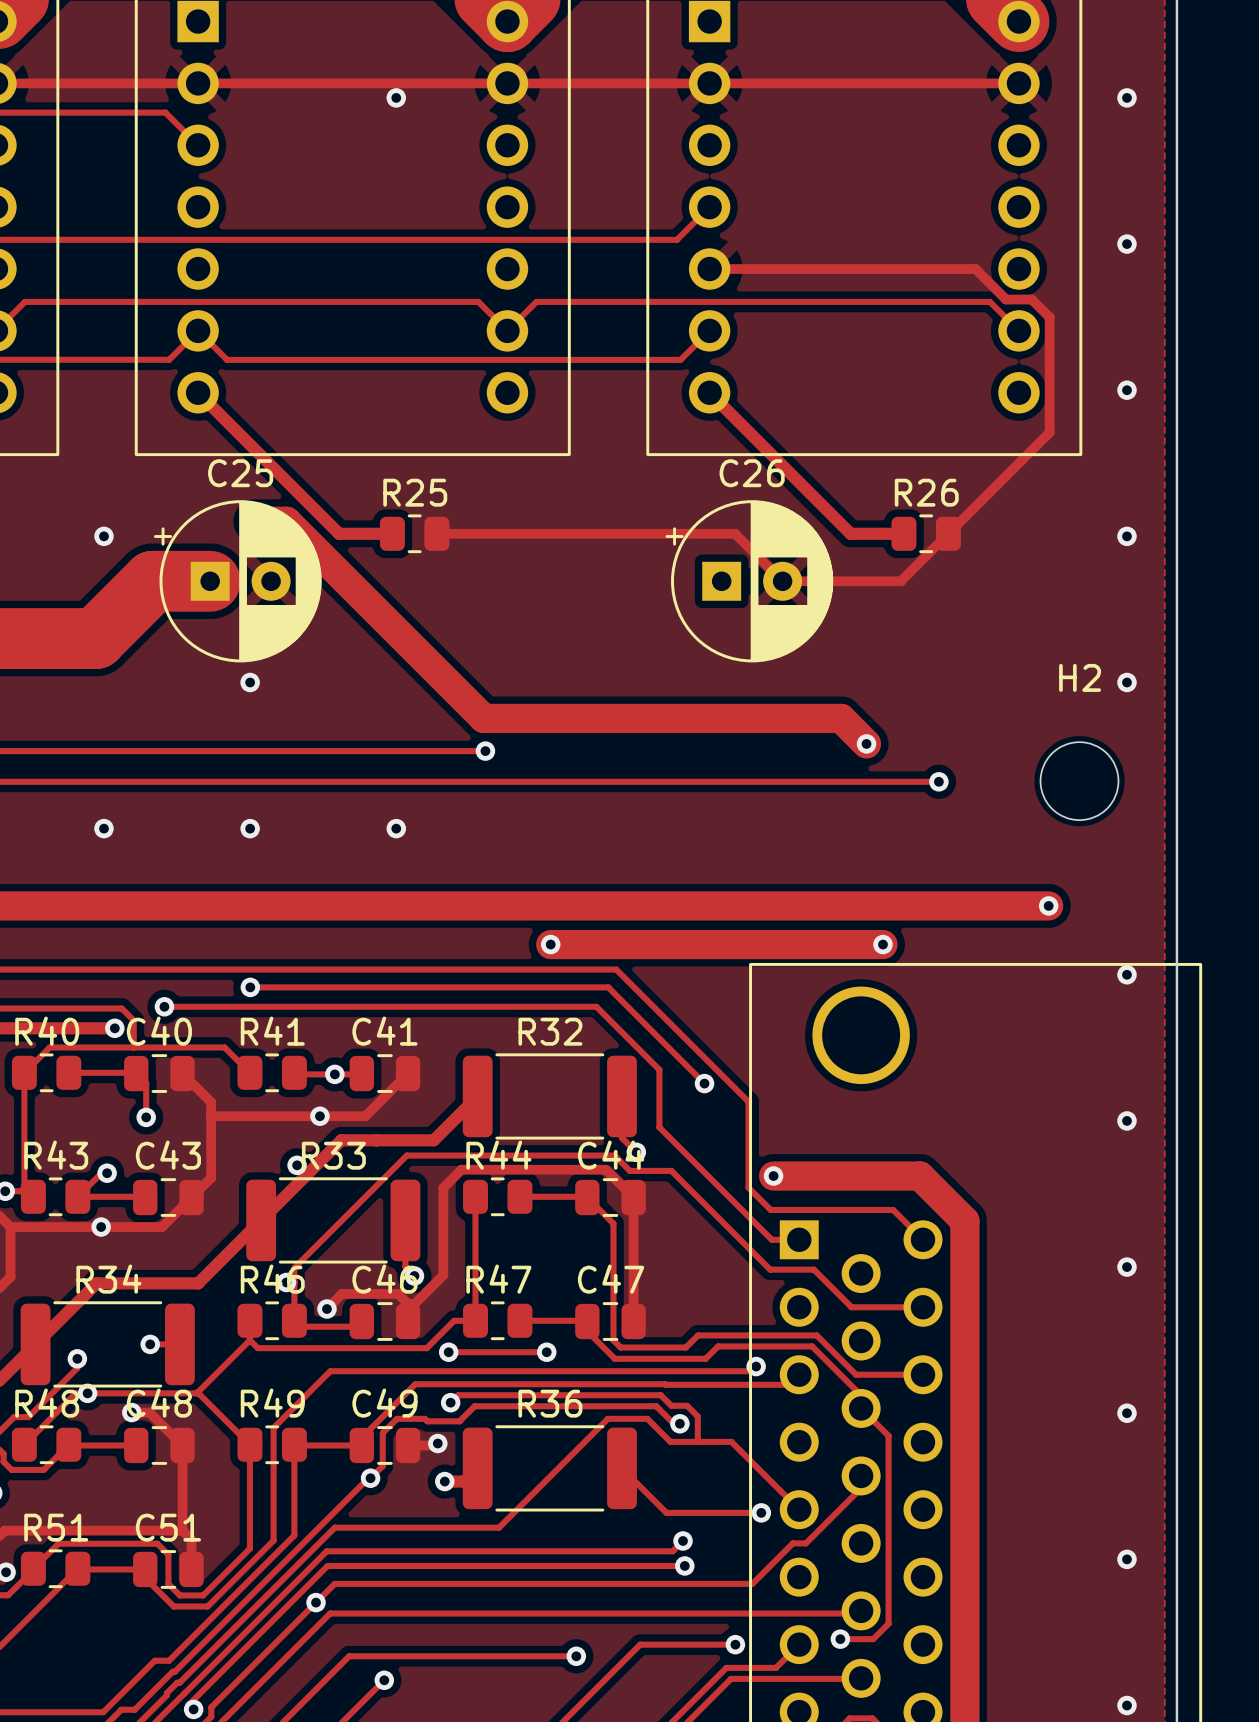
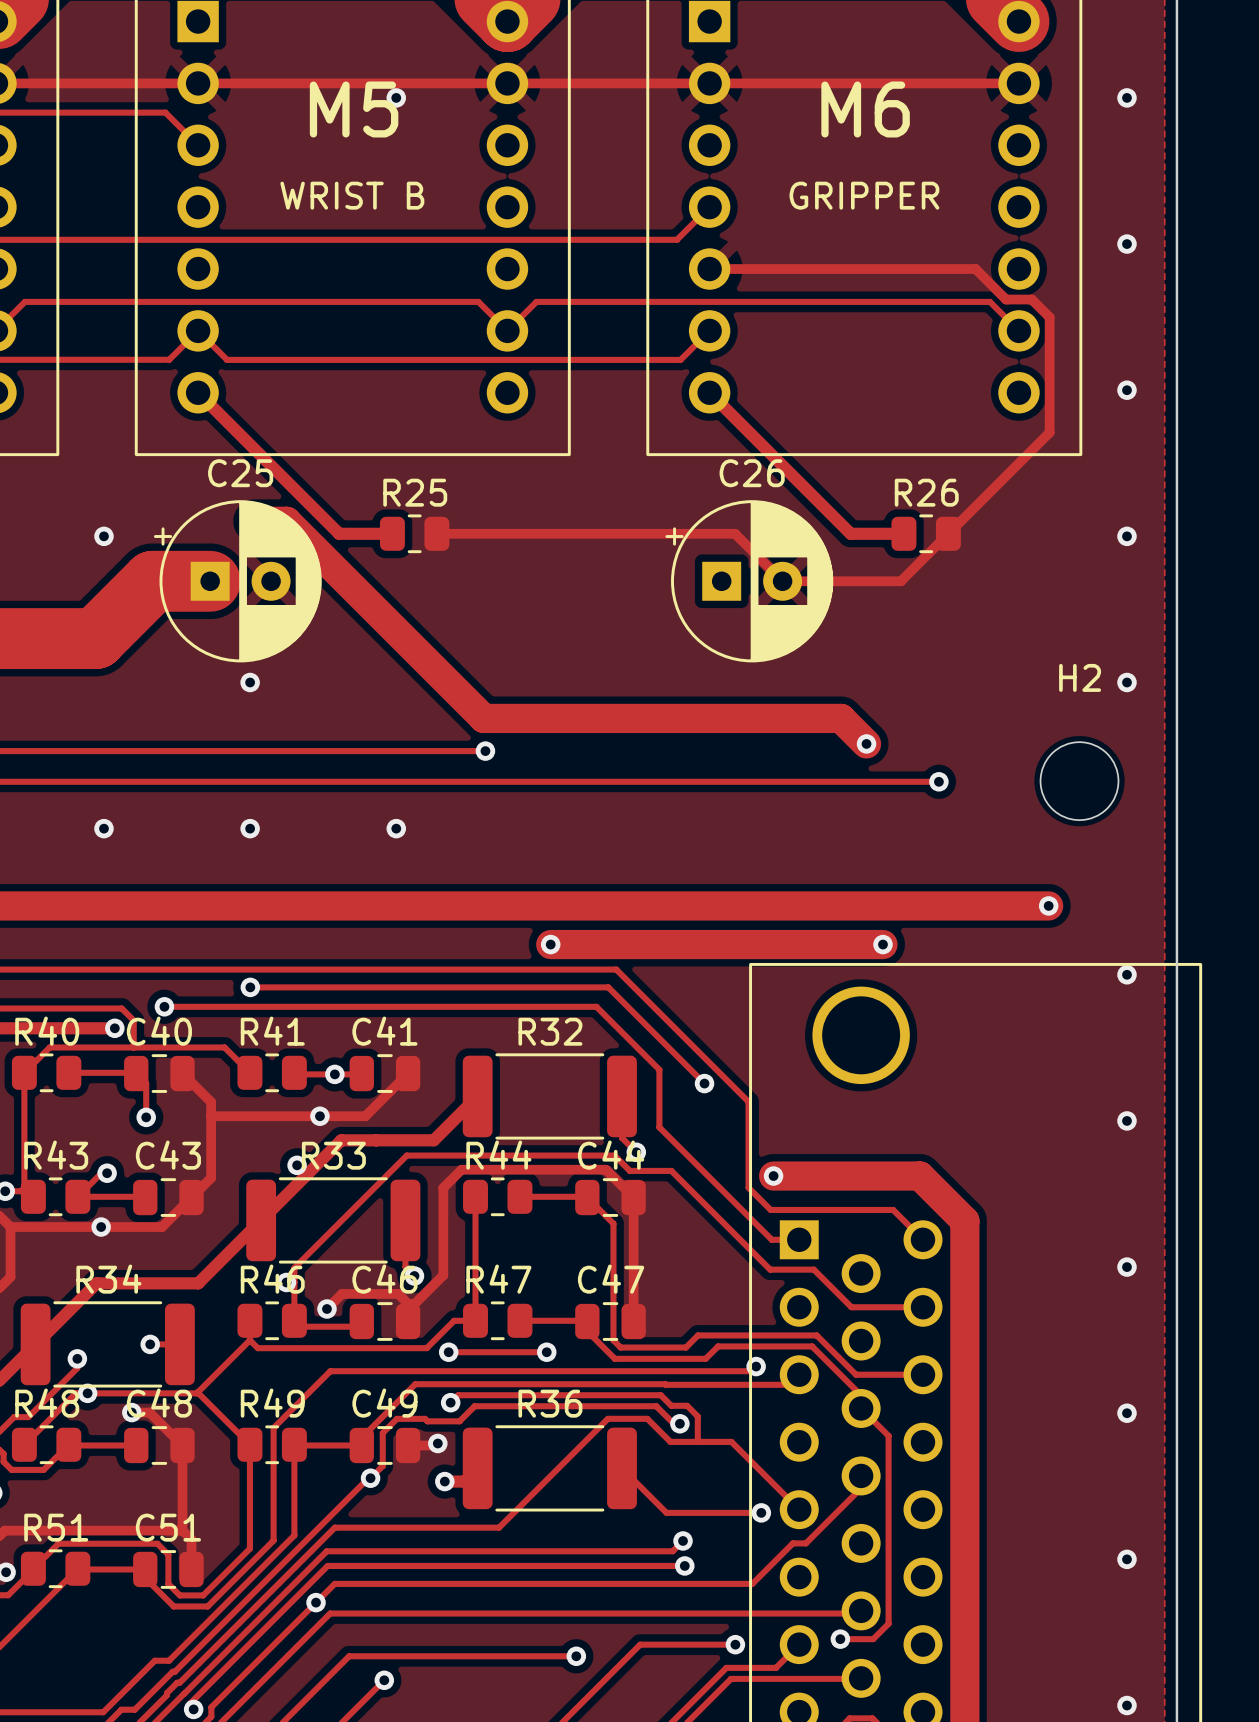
text: none -> M5 (354, 109)
text: none -> M6 (865, 109)
text: none -> WRIST B (352, 195)
text: none -> GRIPPER (864, 195)

